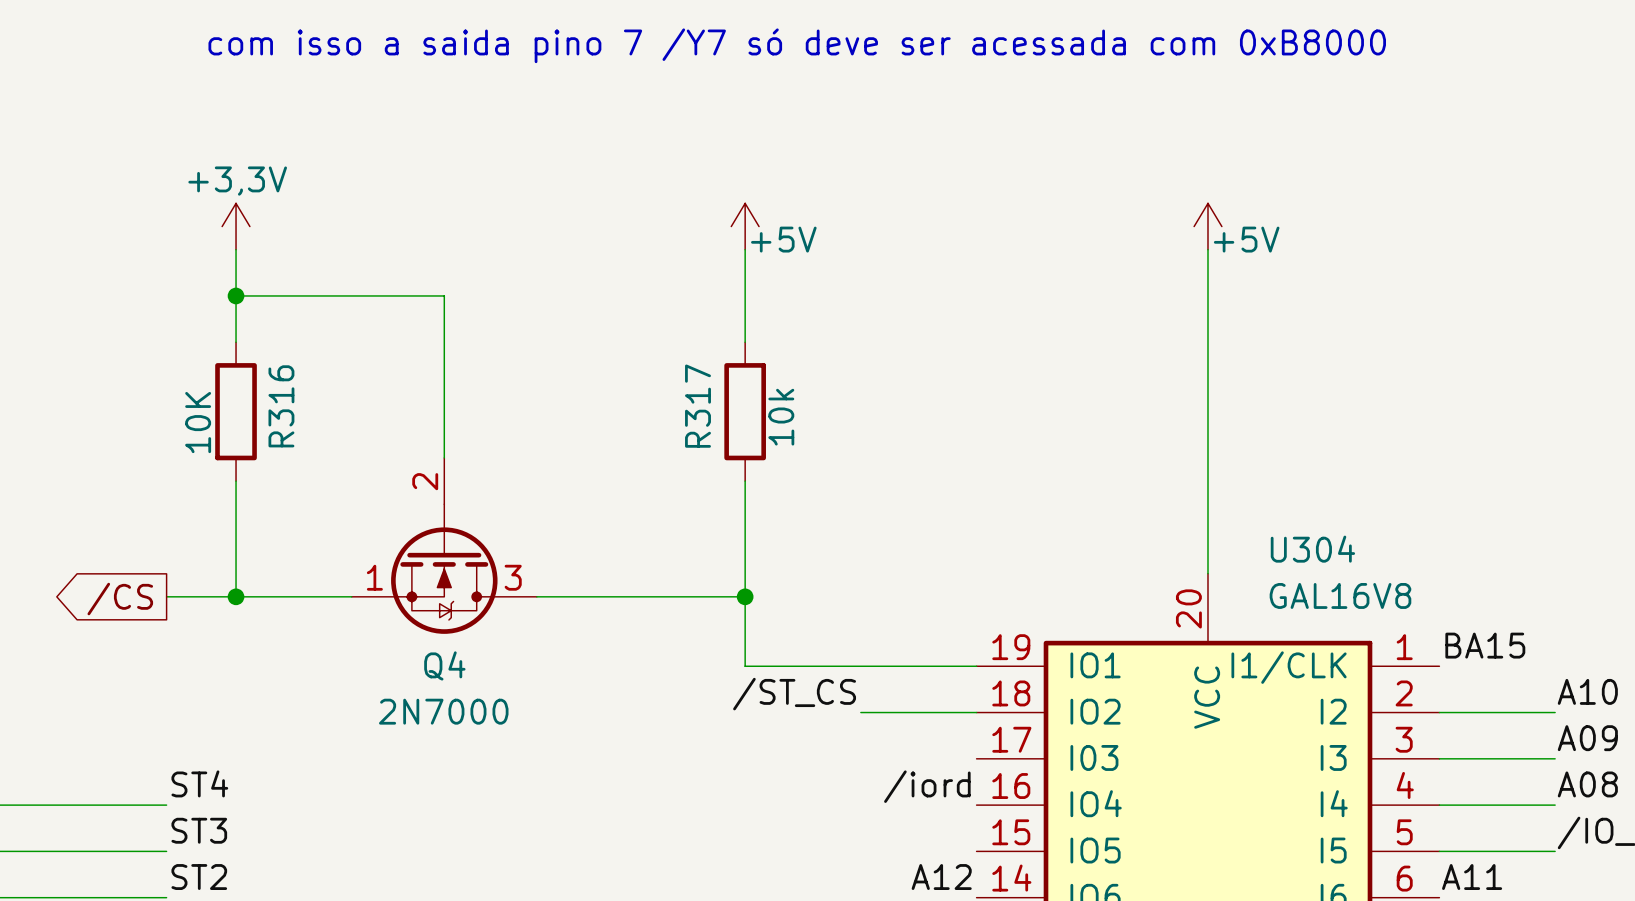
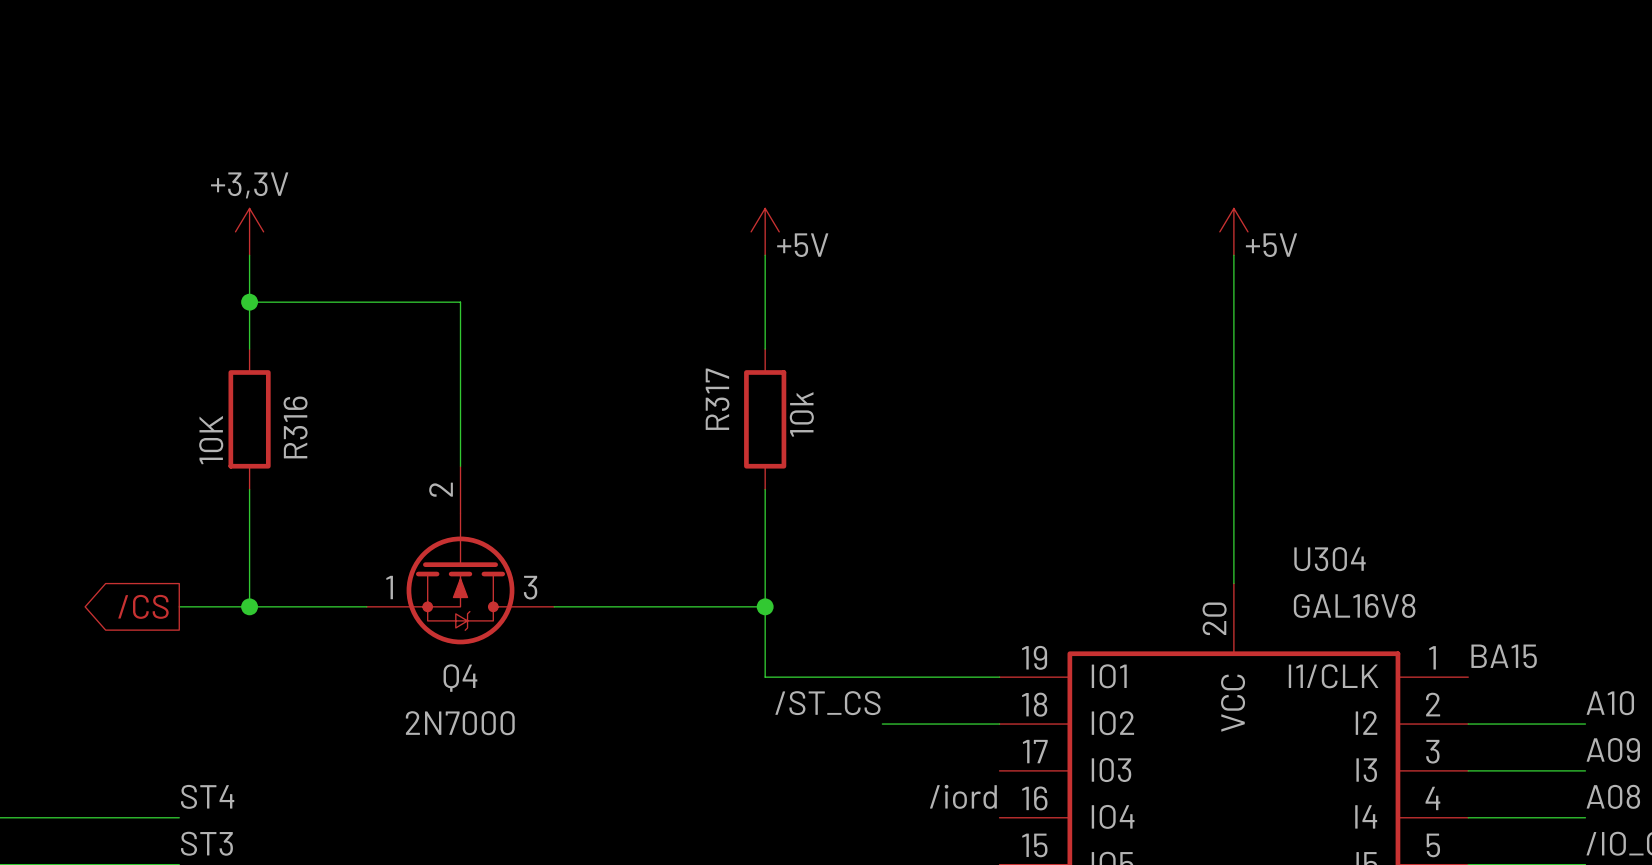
text: com isso a saida pino 7 /Y7 só deve ser acessada com 0xB8000 (797, 45) -> none

